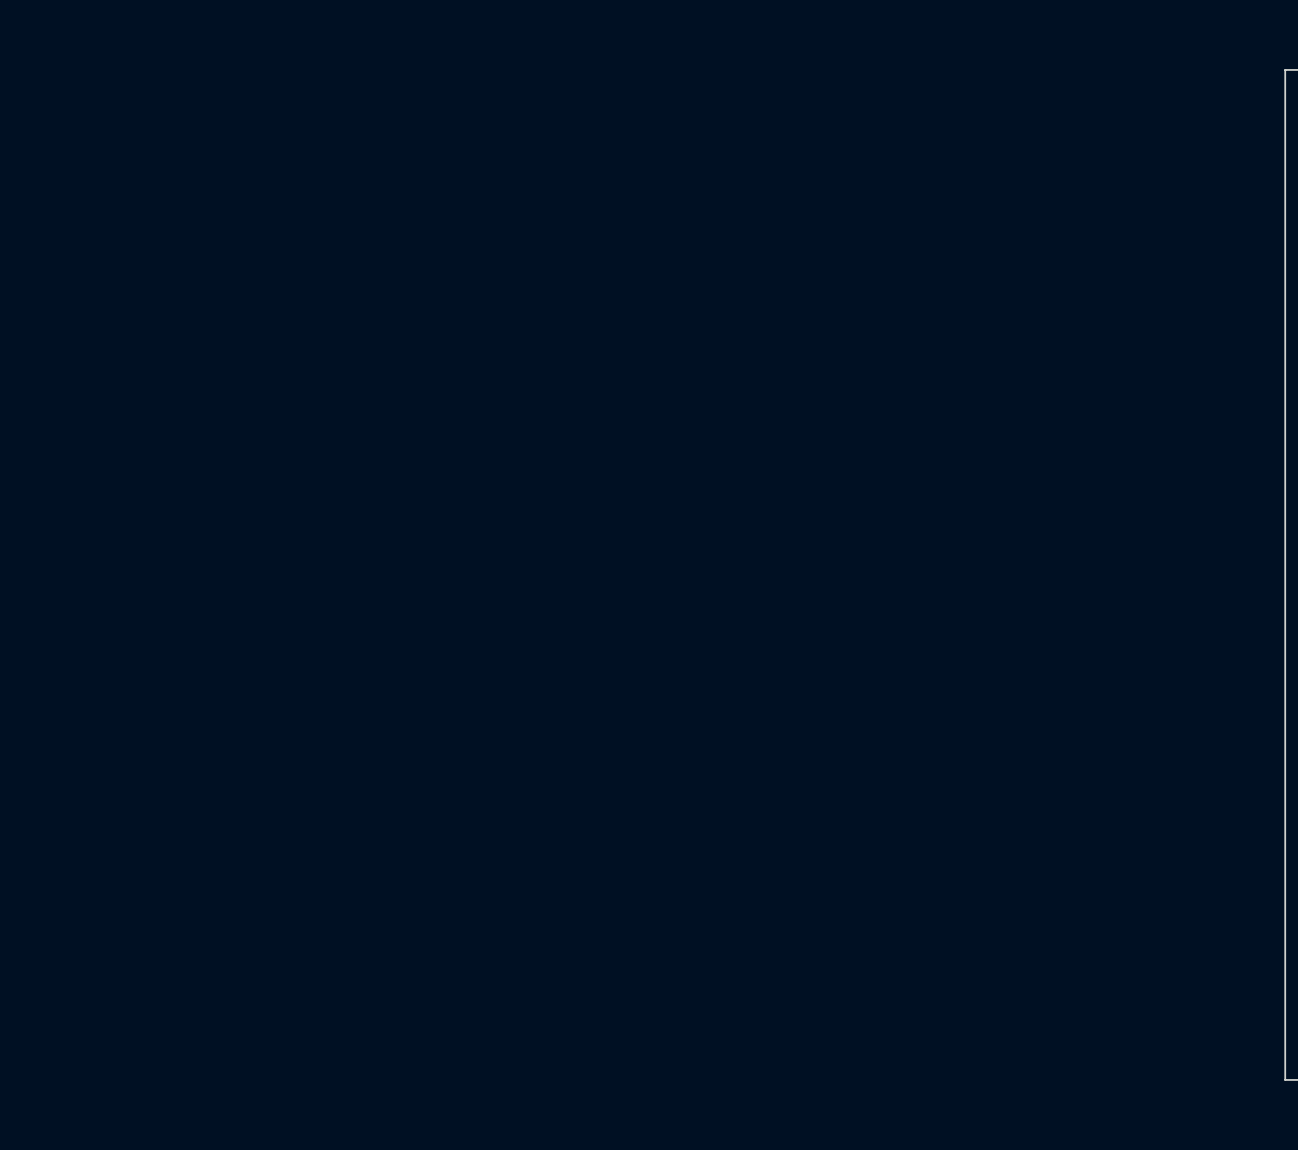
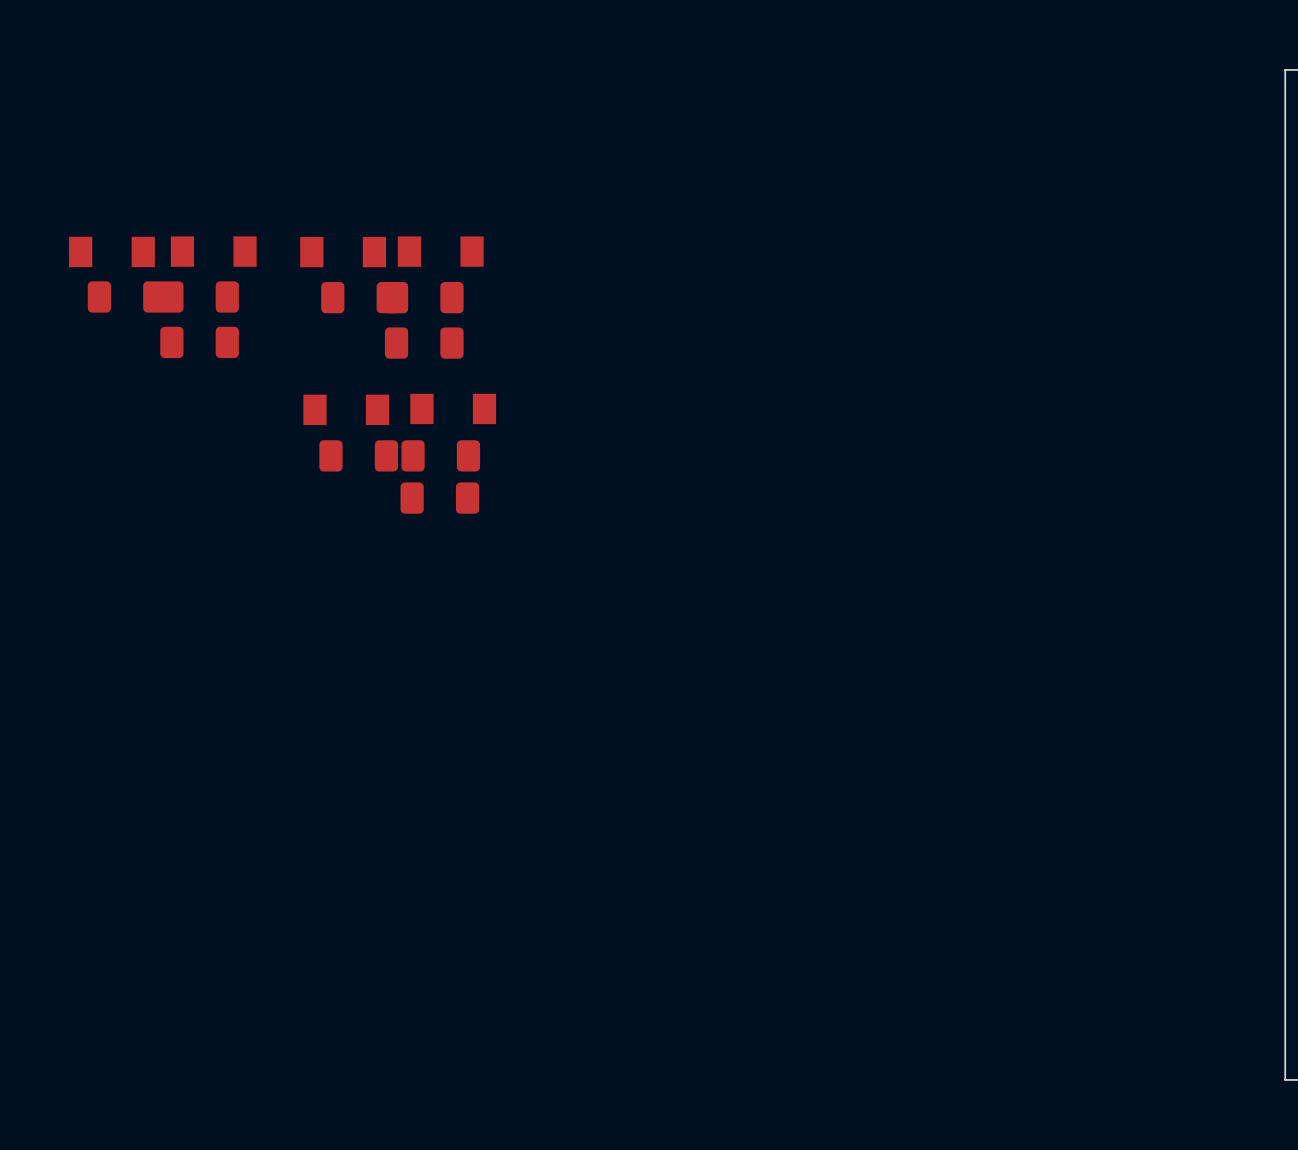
part: none -> (111, 251)
part: none -> (213, 251)
part: none -> (440, 251)
part: none -> (343, 252)
part: none -> (127, 296)
part: none -> (199, 296)
part: none -> (360, 297)
part: none -> (424, 297)
part: none -> (199, 342)
part: none -> (424, 343)
part: none -> (453, 408)
part: none -> (346, 409)
part: none -> (358, 455)
part: none -> (440, 455)
part: none -> (439, 498)

